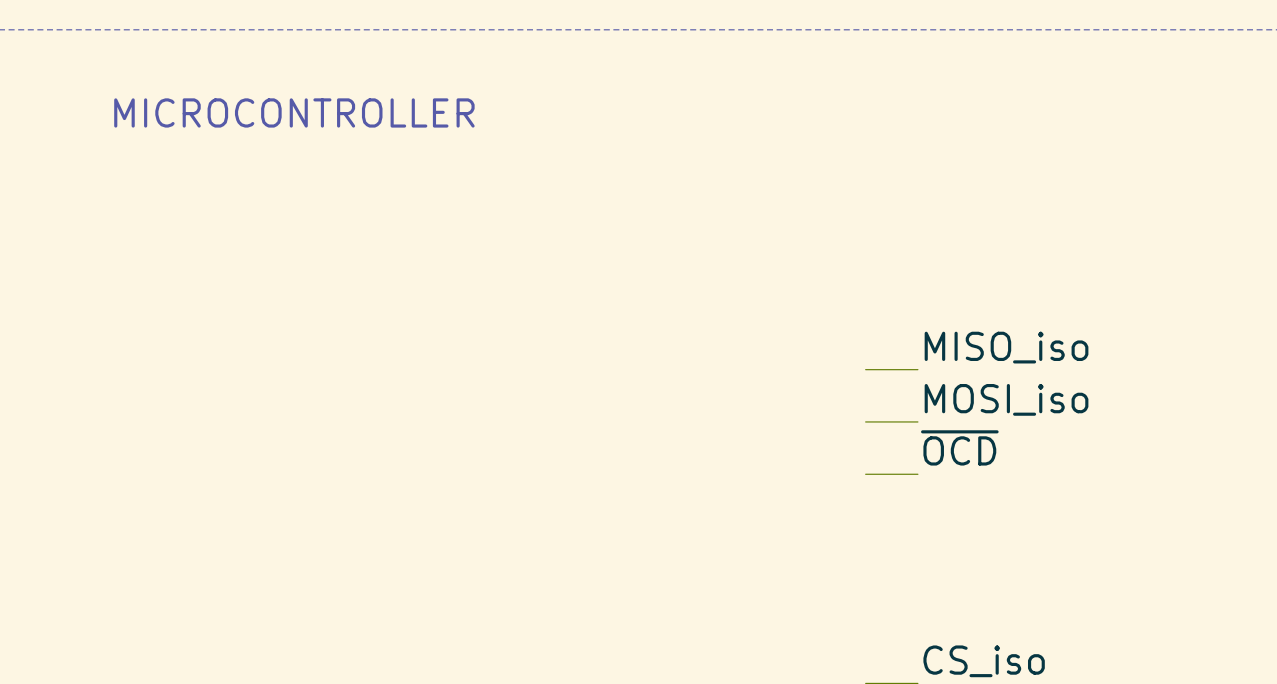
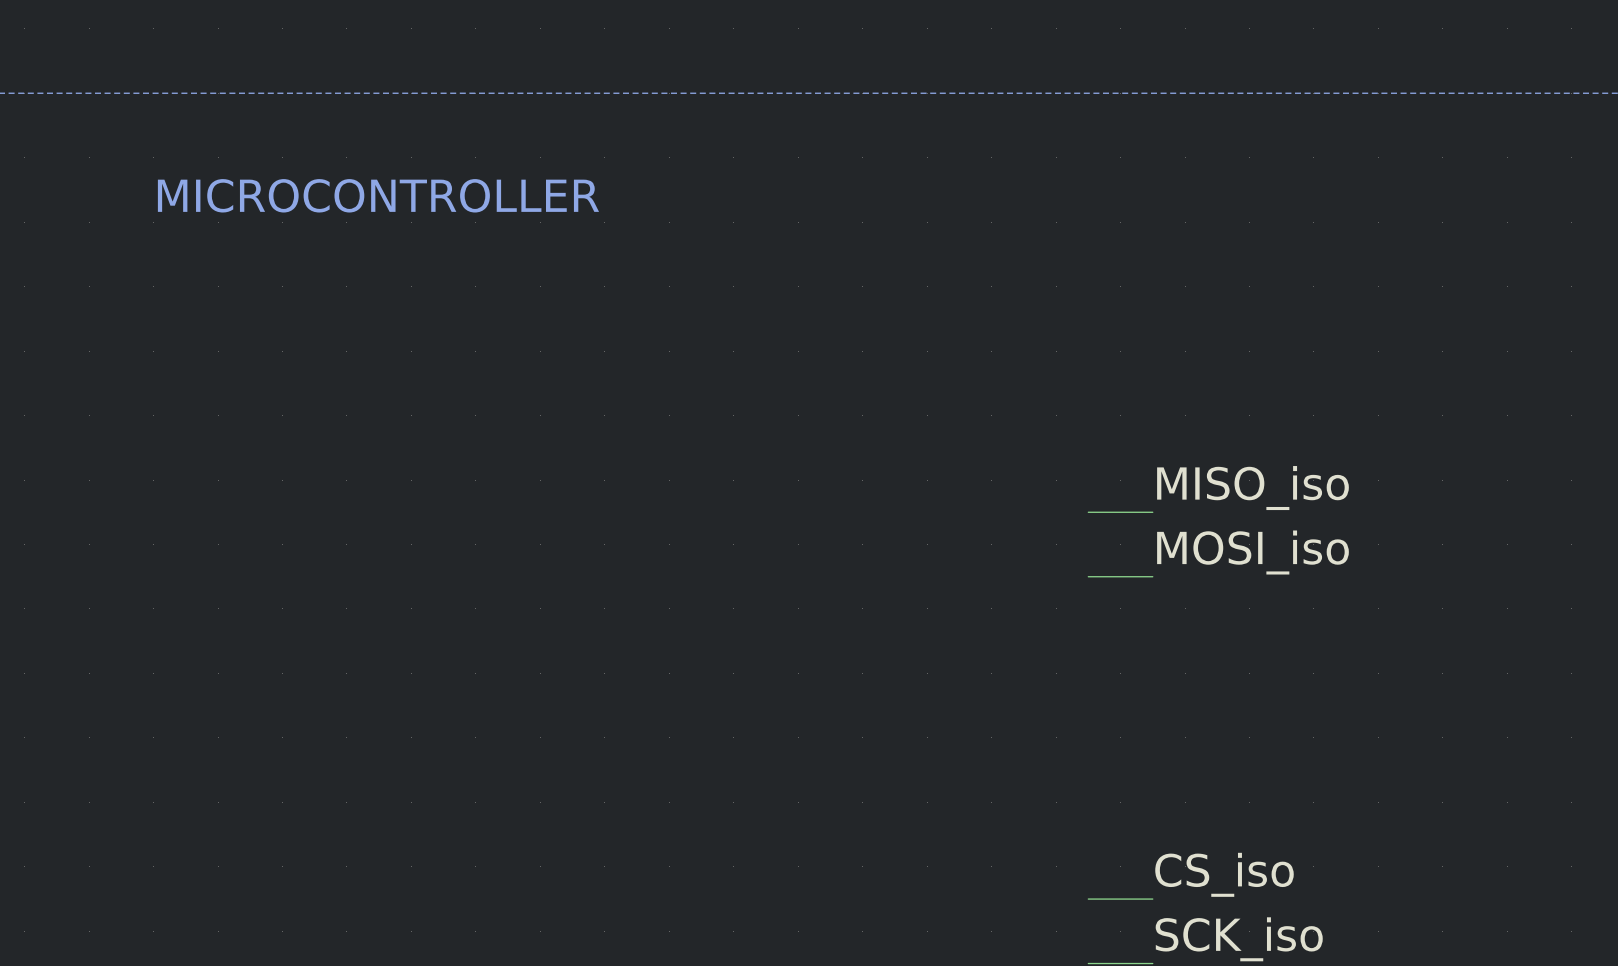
label: ~{OCD} (959, 447) -> none
wire: (865, 474) (917, 474) -> none

